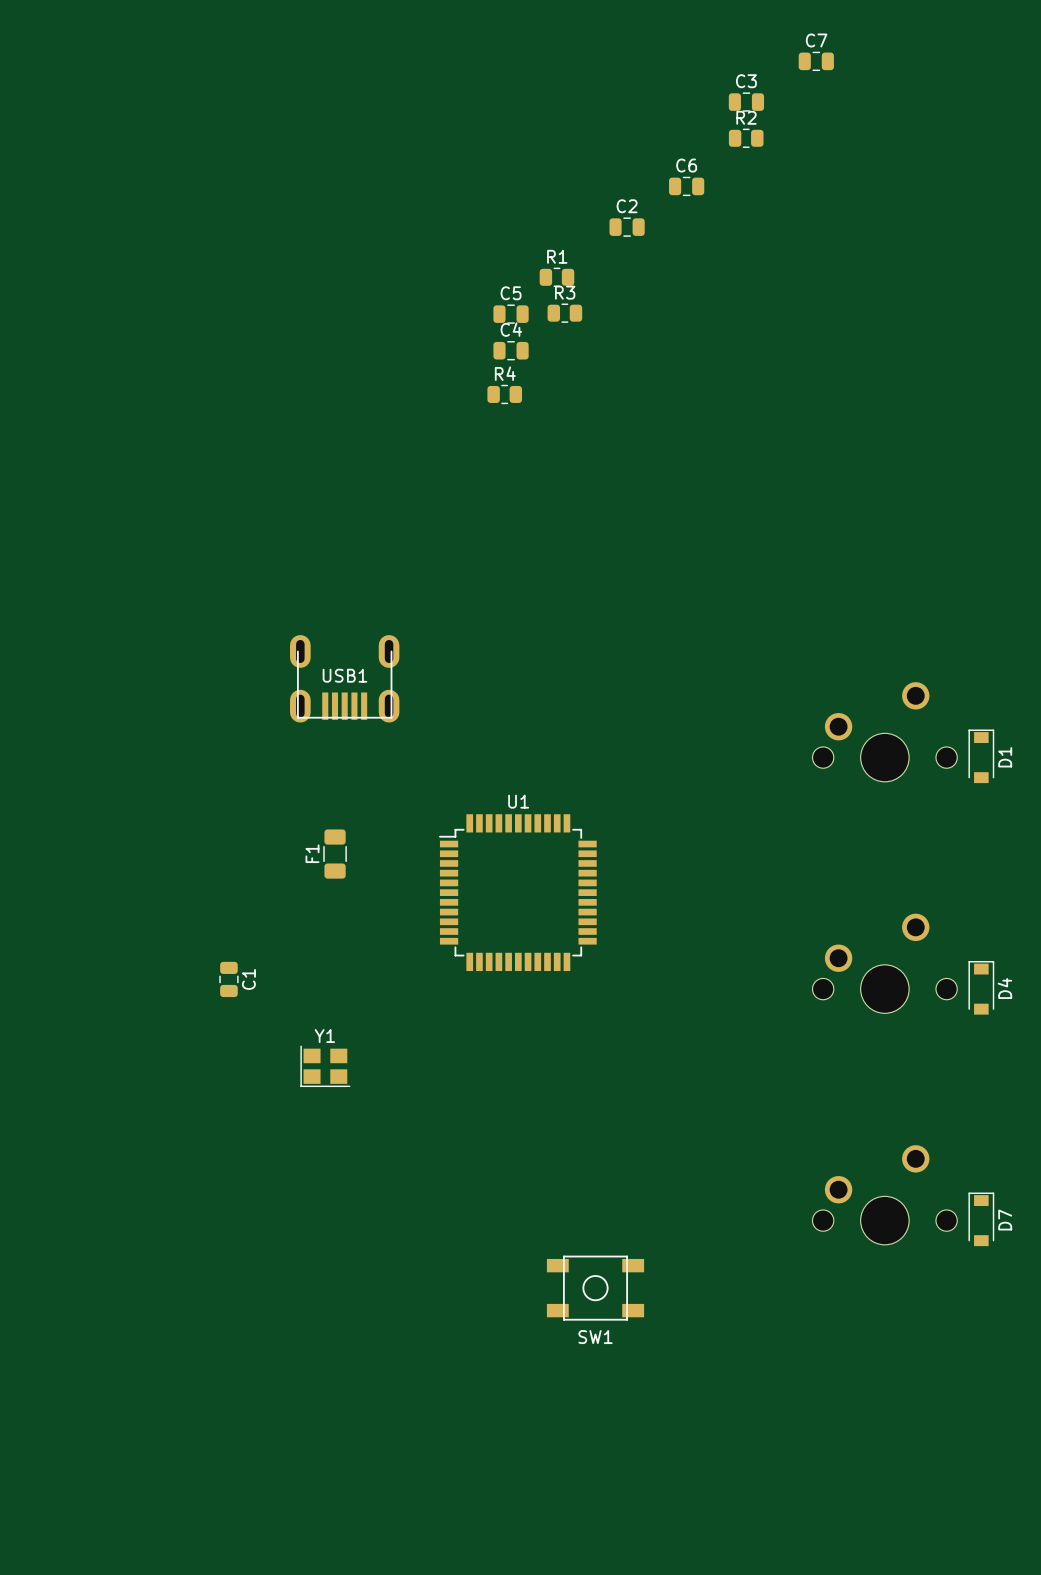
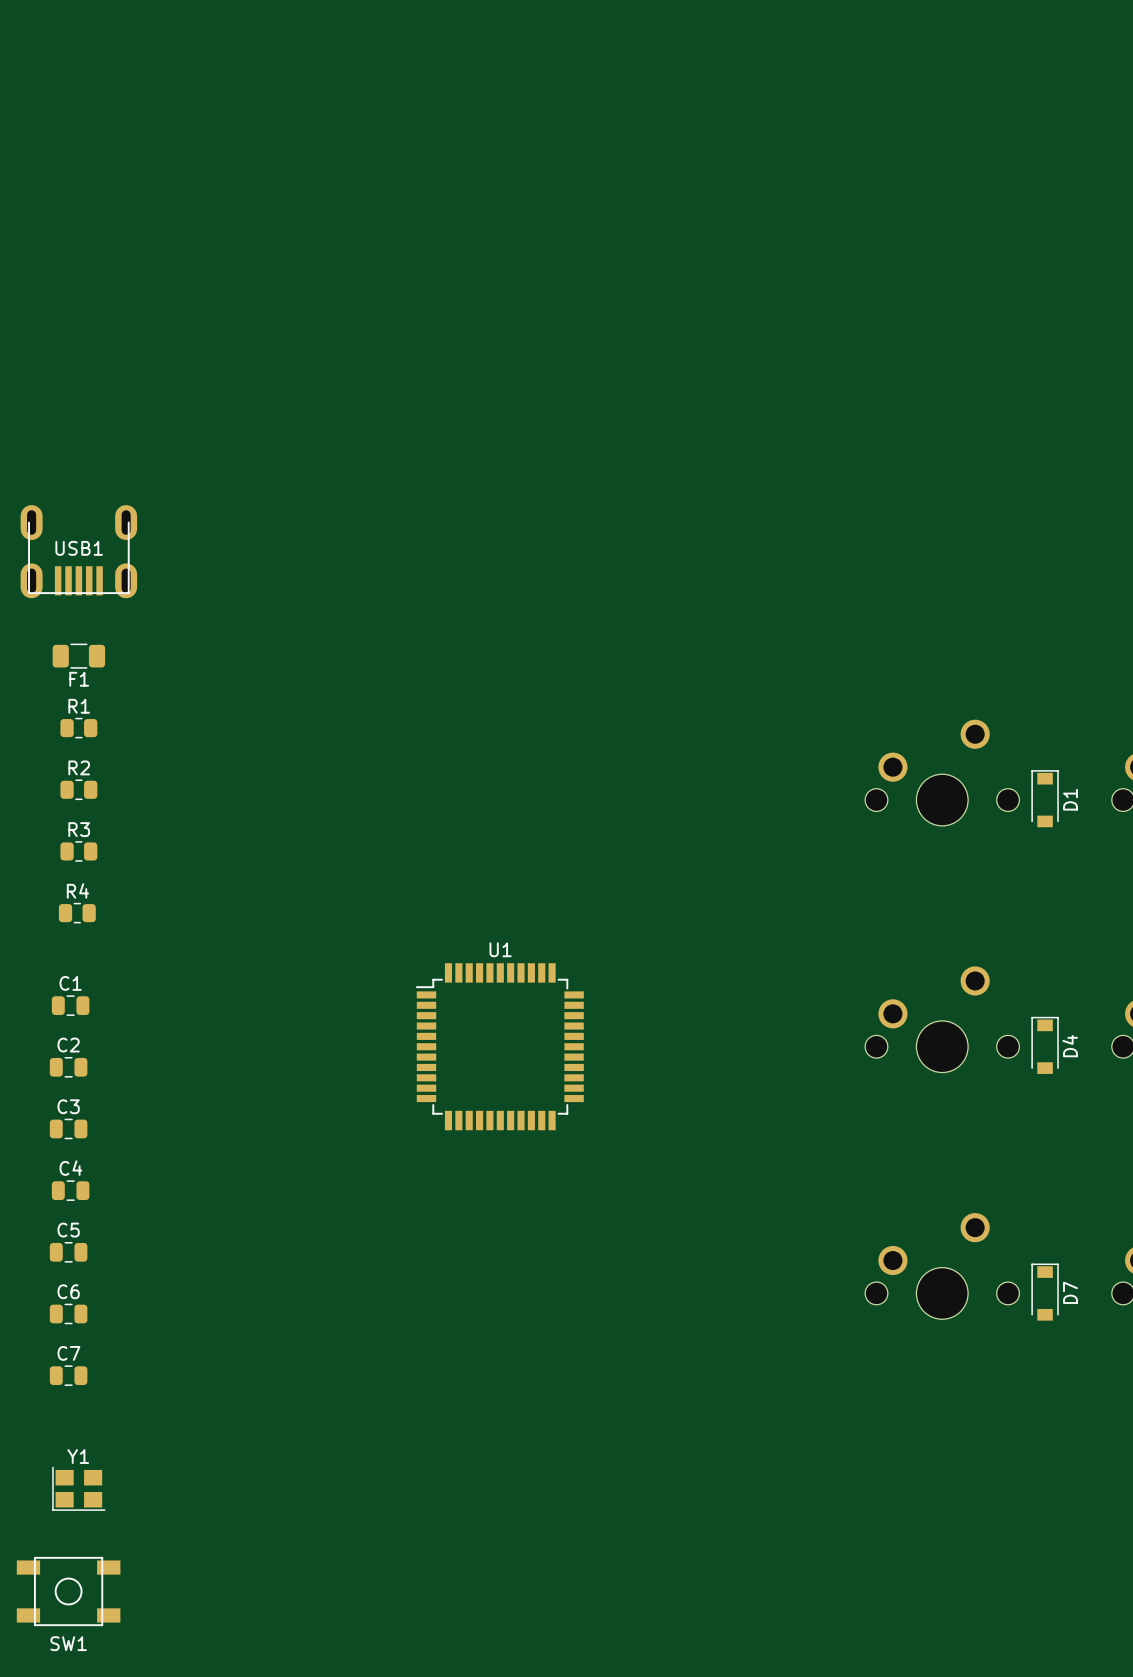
C7 position: (816, 61) -> (68, 1375)
C3 position: (746, 102) -> (68, 1128)
R2 position: (746, 138) -> (78, 789)
C6 position: (686, 186) -> (68, 1313)
C2 position: (627, 227) -> (68, 1067)
R1 position: (556, 277) -> (78, 728)
R3 position: (564, 313) -> (78, 851)
C5 position: (511, 314) -> (68, 1252)
C4 position: (511, 350) -> (70, 1190)
R4 position: (504, 394) -> (77, 913)
USB1 position: (344, 678) -> (78, 551)
F1 name position: F1 (312, 853) -> F1 (79, 679)
F1 rotation: 0° (335, 854) -> 90° clockwise (78, 656)
F1 position: (335, 854) -> (78, 656)
U1 position: (517, 892) -> (499, 1046)
C1 rotation: 0° (228, 979) -> 90° clockwise (70, 1005)
C1 position: (228, 979) -> (70, 1005)
C1 name position: C1 (248, 979) -> C1 (70, 983)
Y1 position: (325, 1066) -> (78, 1488)
SW1 position: (595, 1288) -> (68, 1591)

